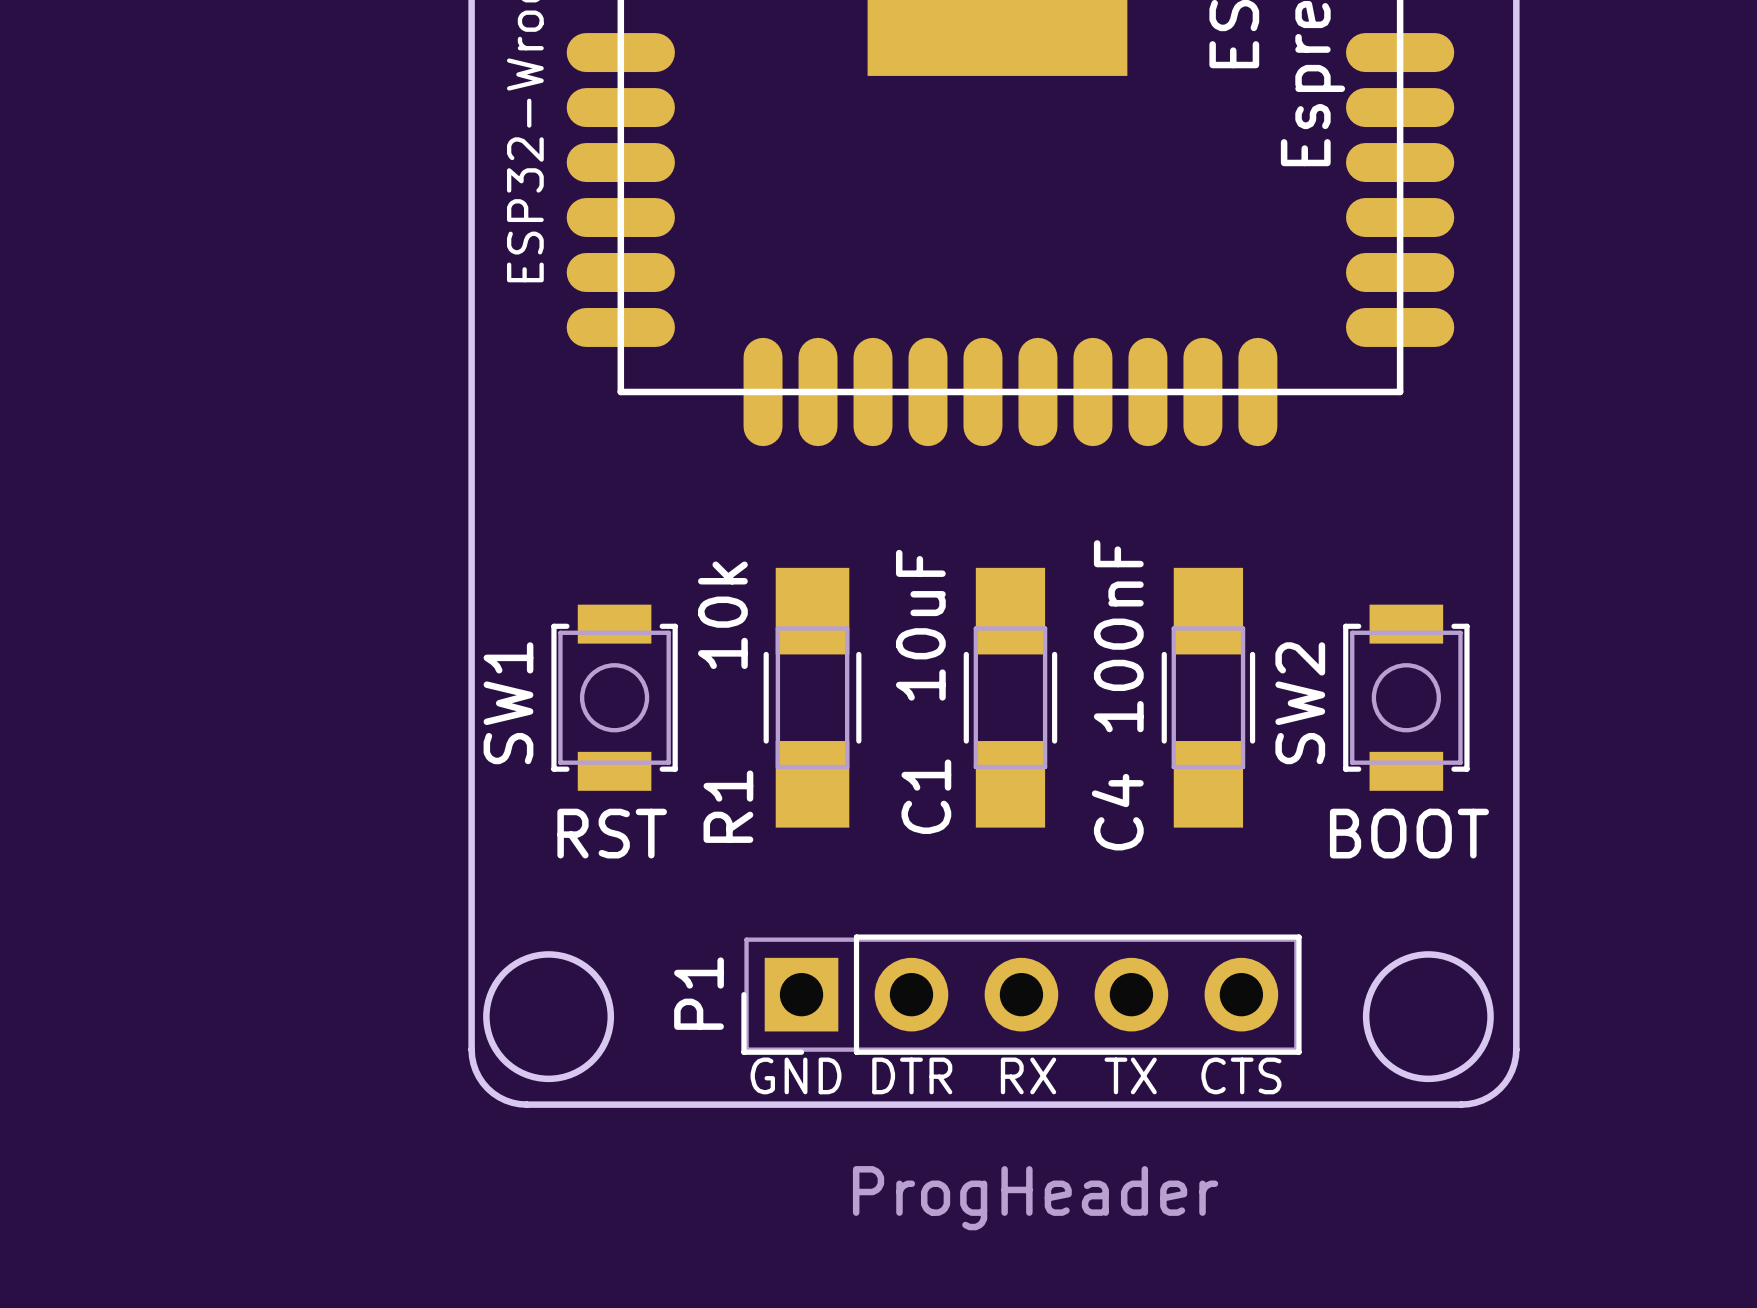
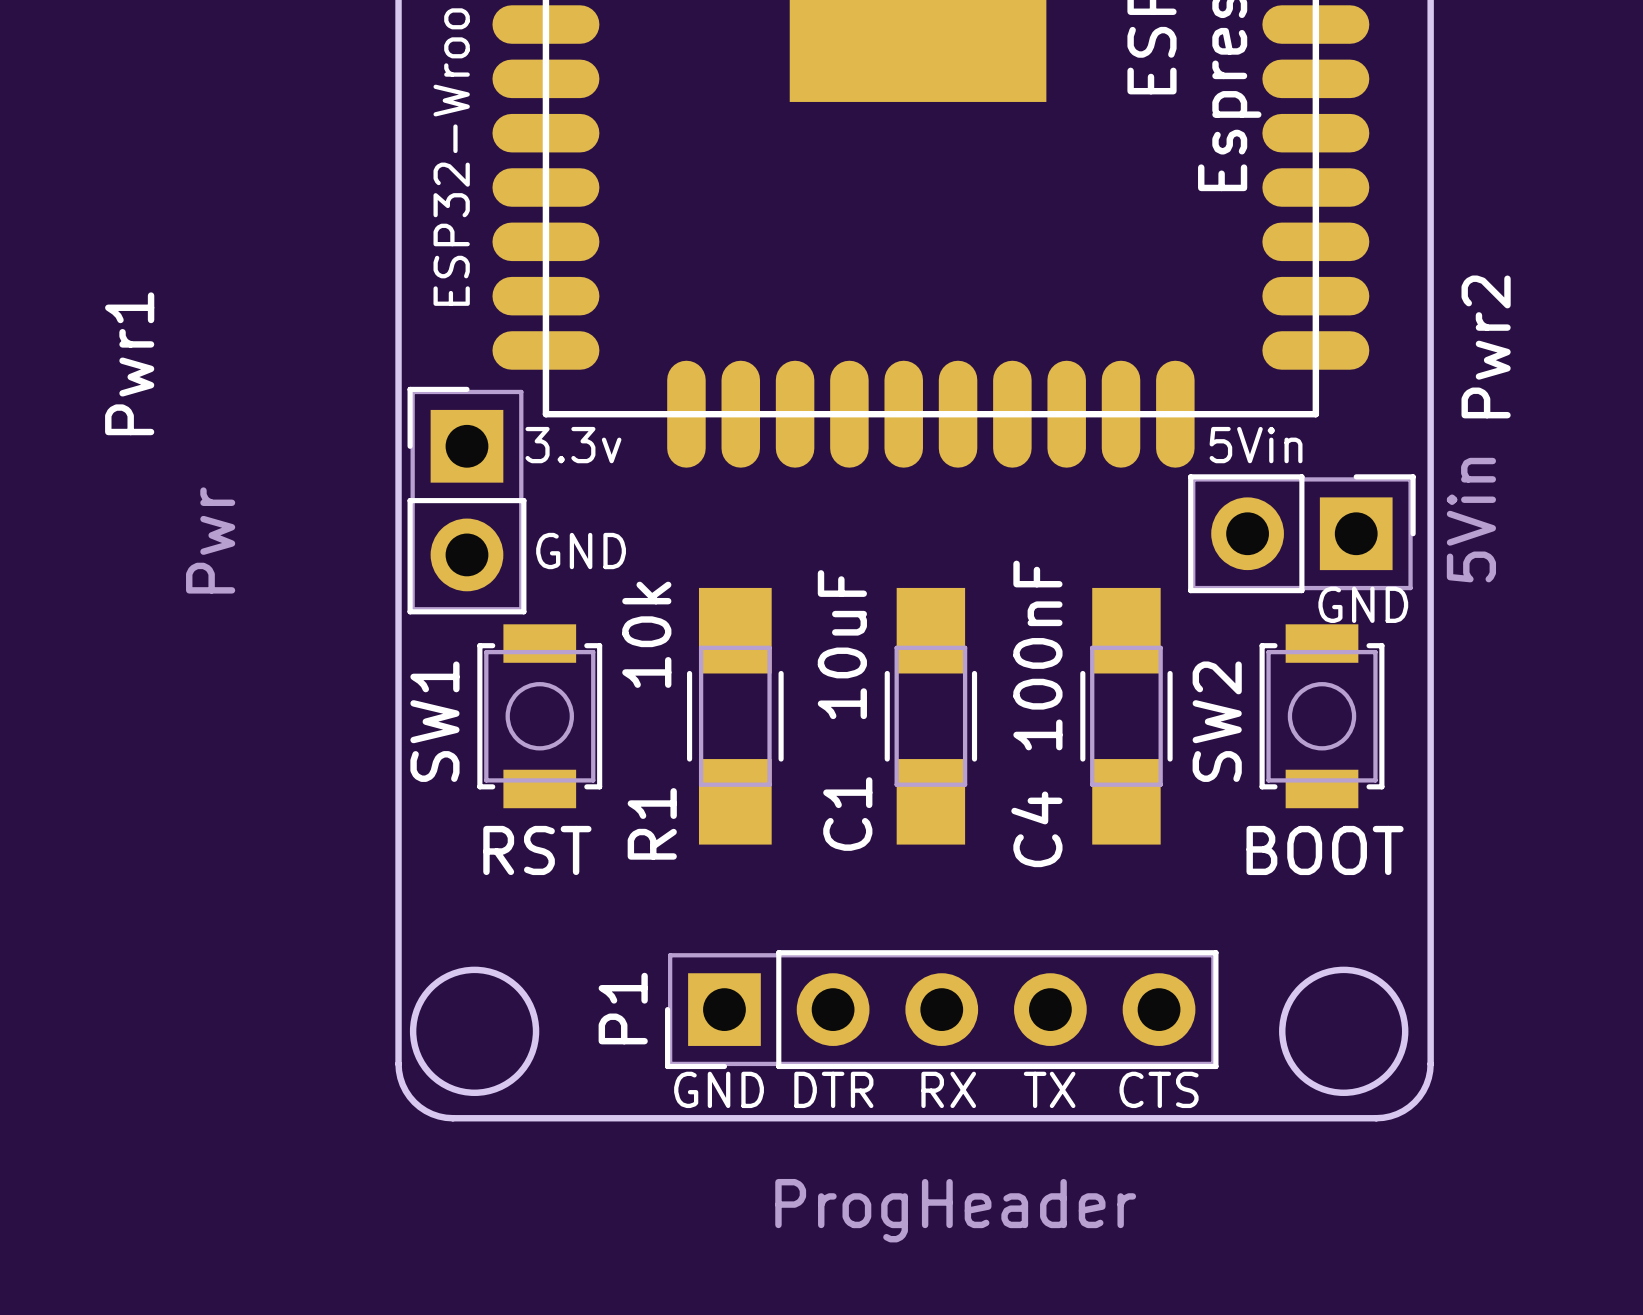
text: none -> 3.3v (573, 445)
text: none -> 5Vin (1256, 445)
Pwr1: none -> Pwr (466, 500)
Pwr2: none -> 5Vin (1301, 533)
text: none -> GND (581, 551)
text: none -> GND (1363, 604)

